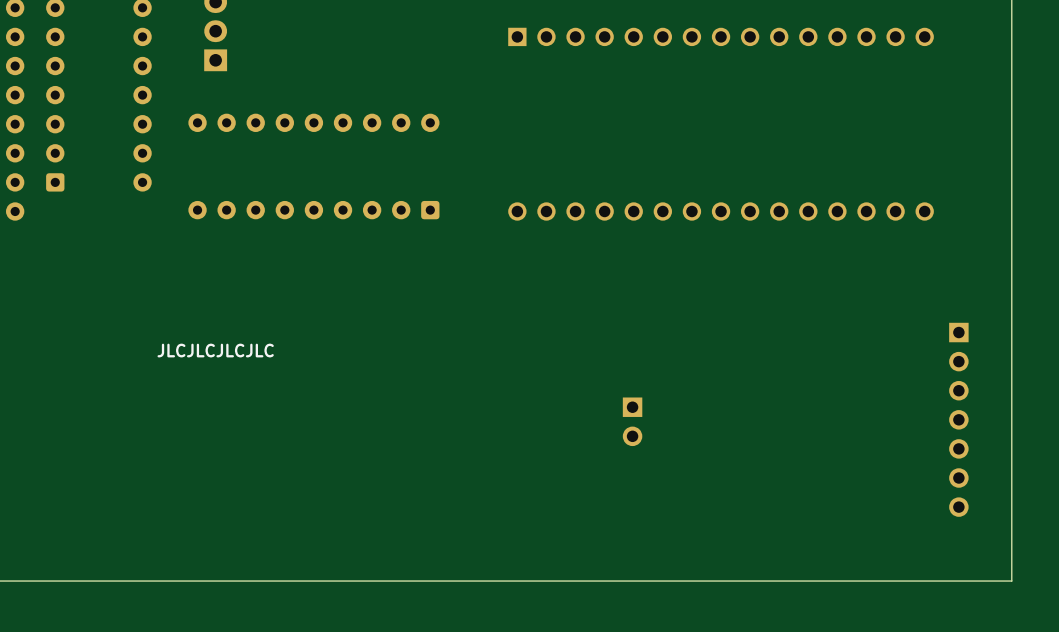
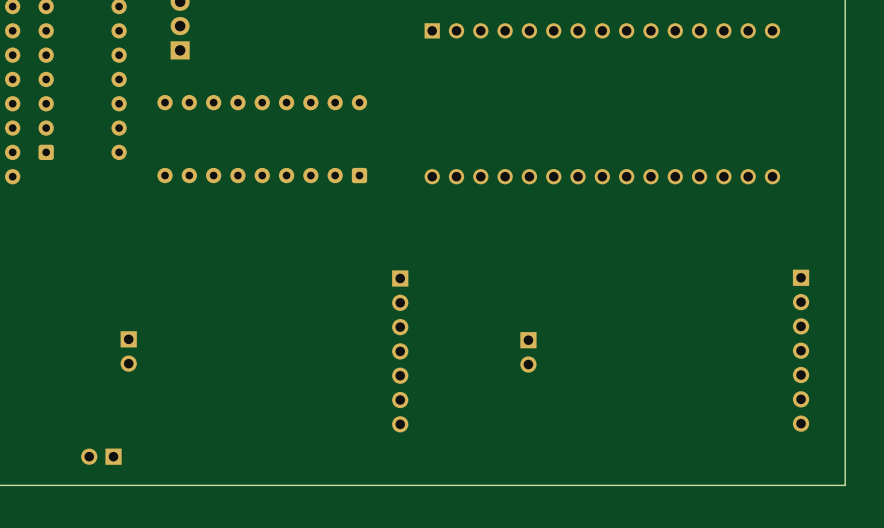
text: JLCJLCJLCJLC (215, 350) -> none
part: none -> (128, 351)
part: none -> (400, 351)
part: none -> (101, 456)

